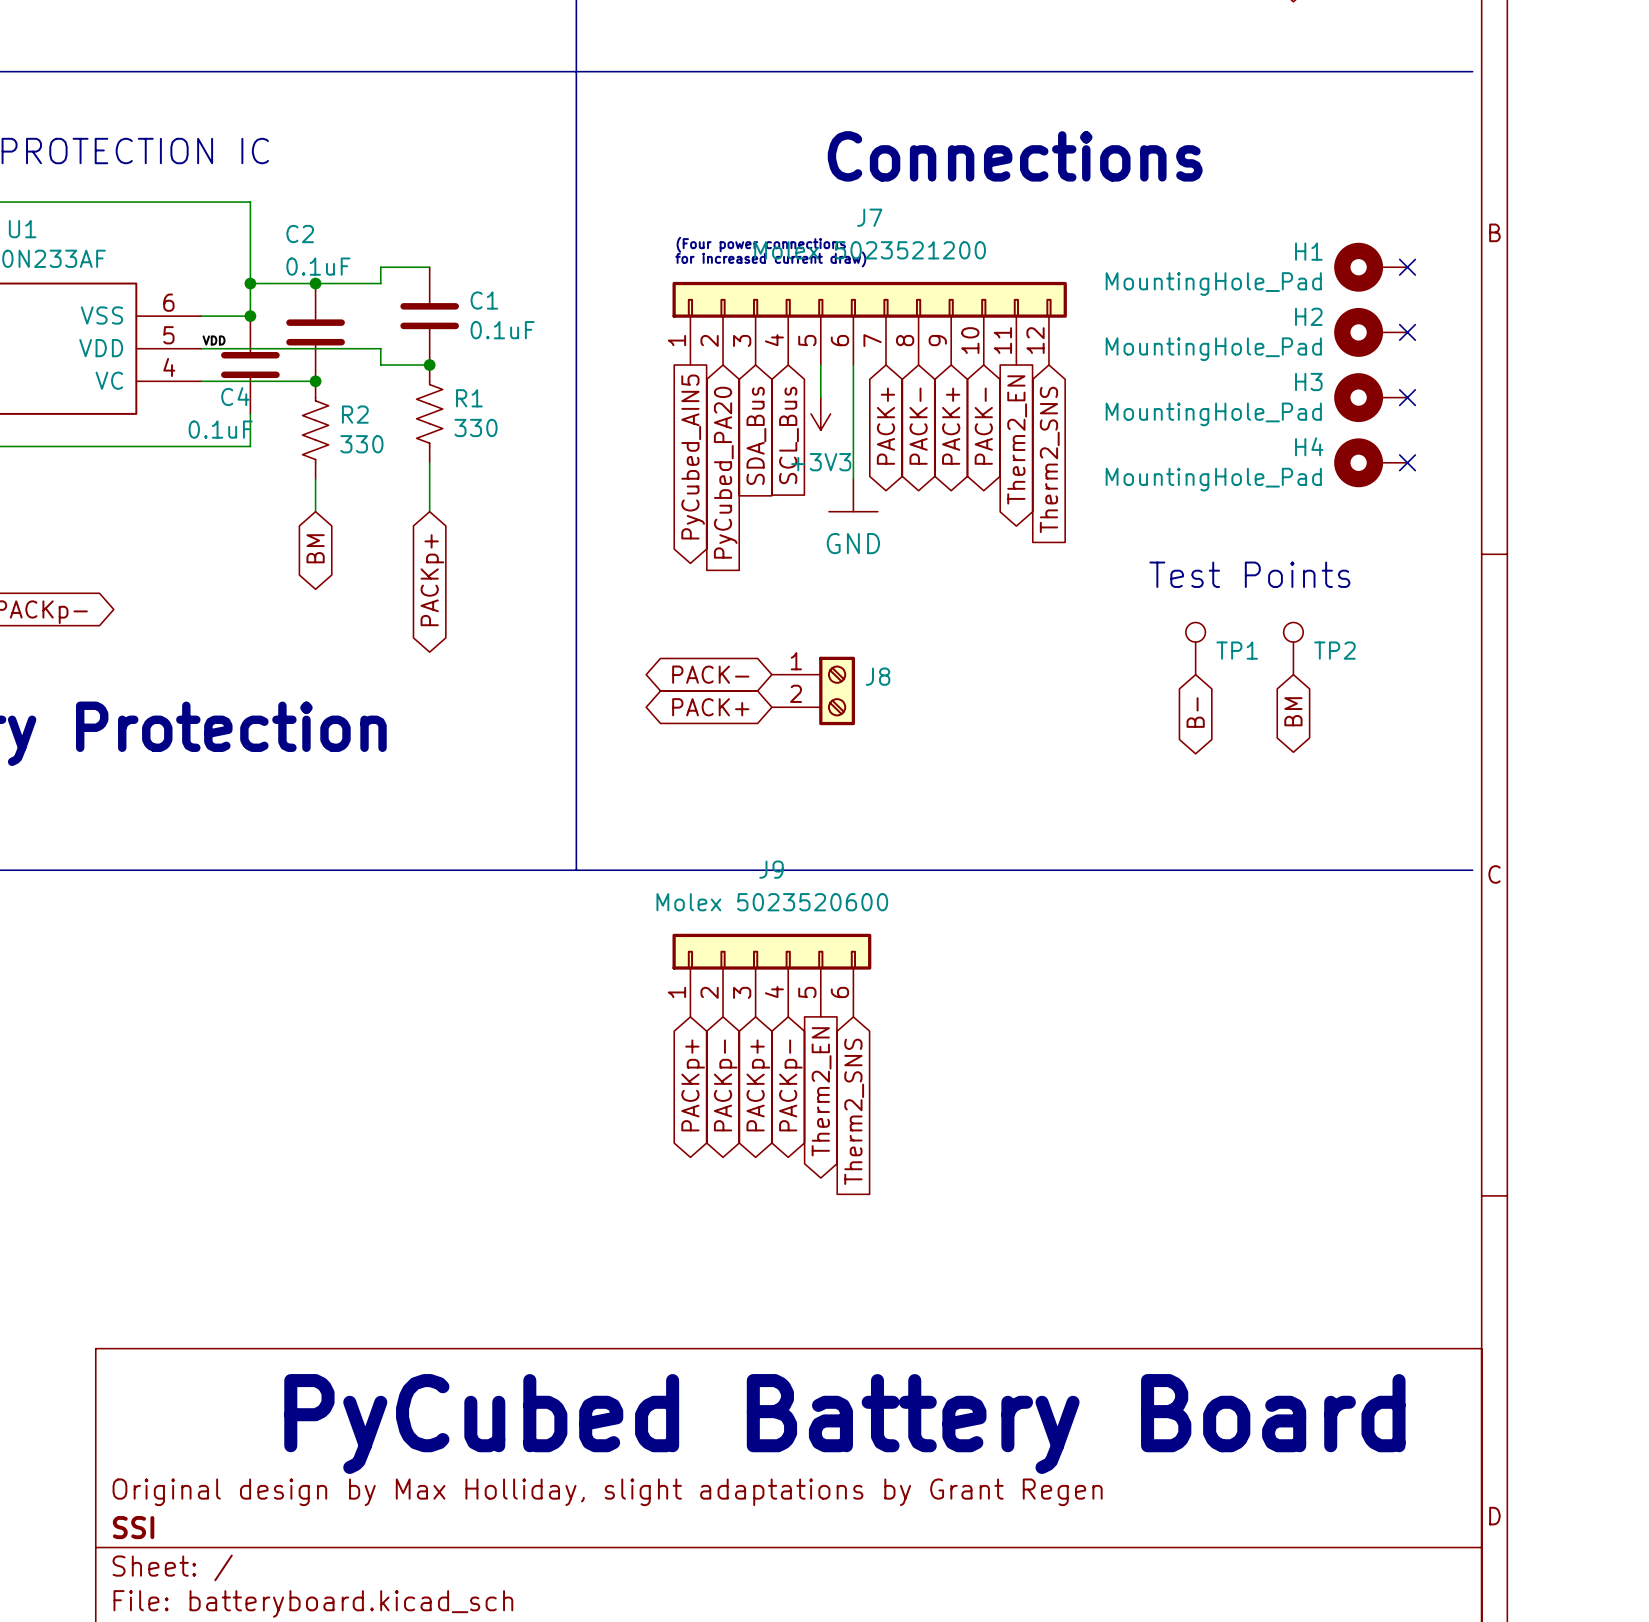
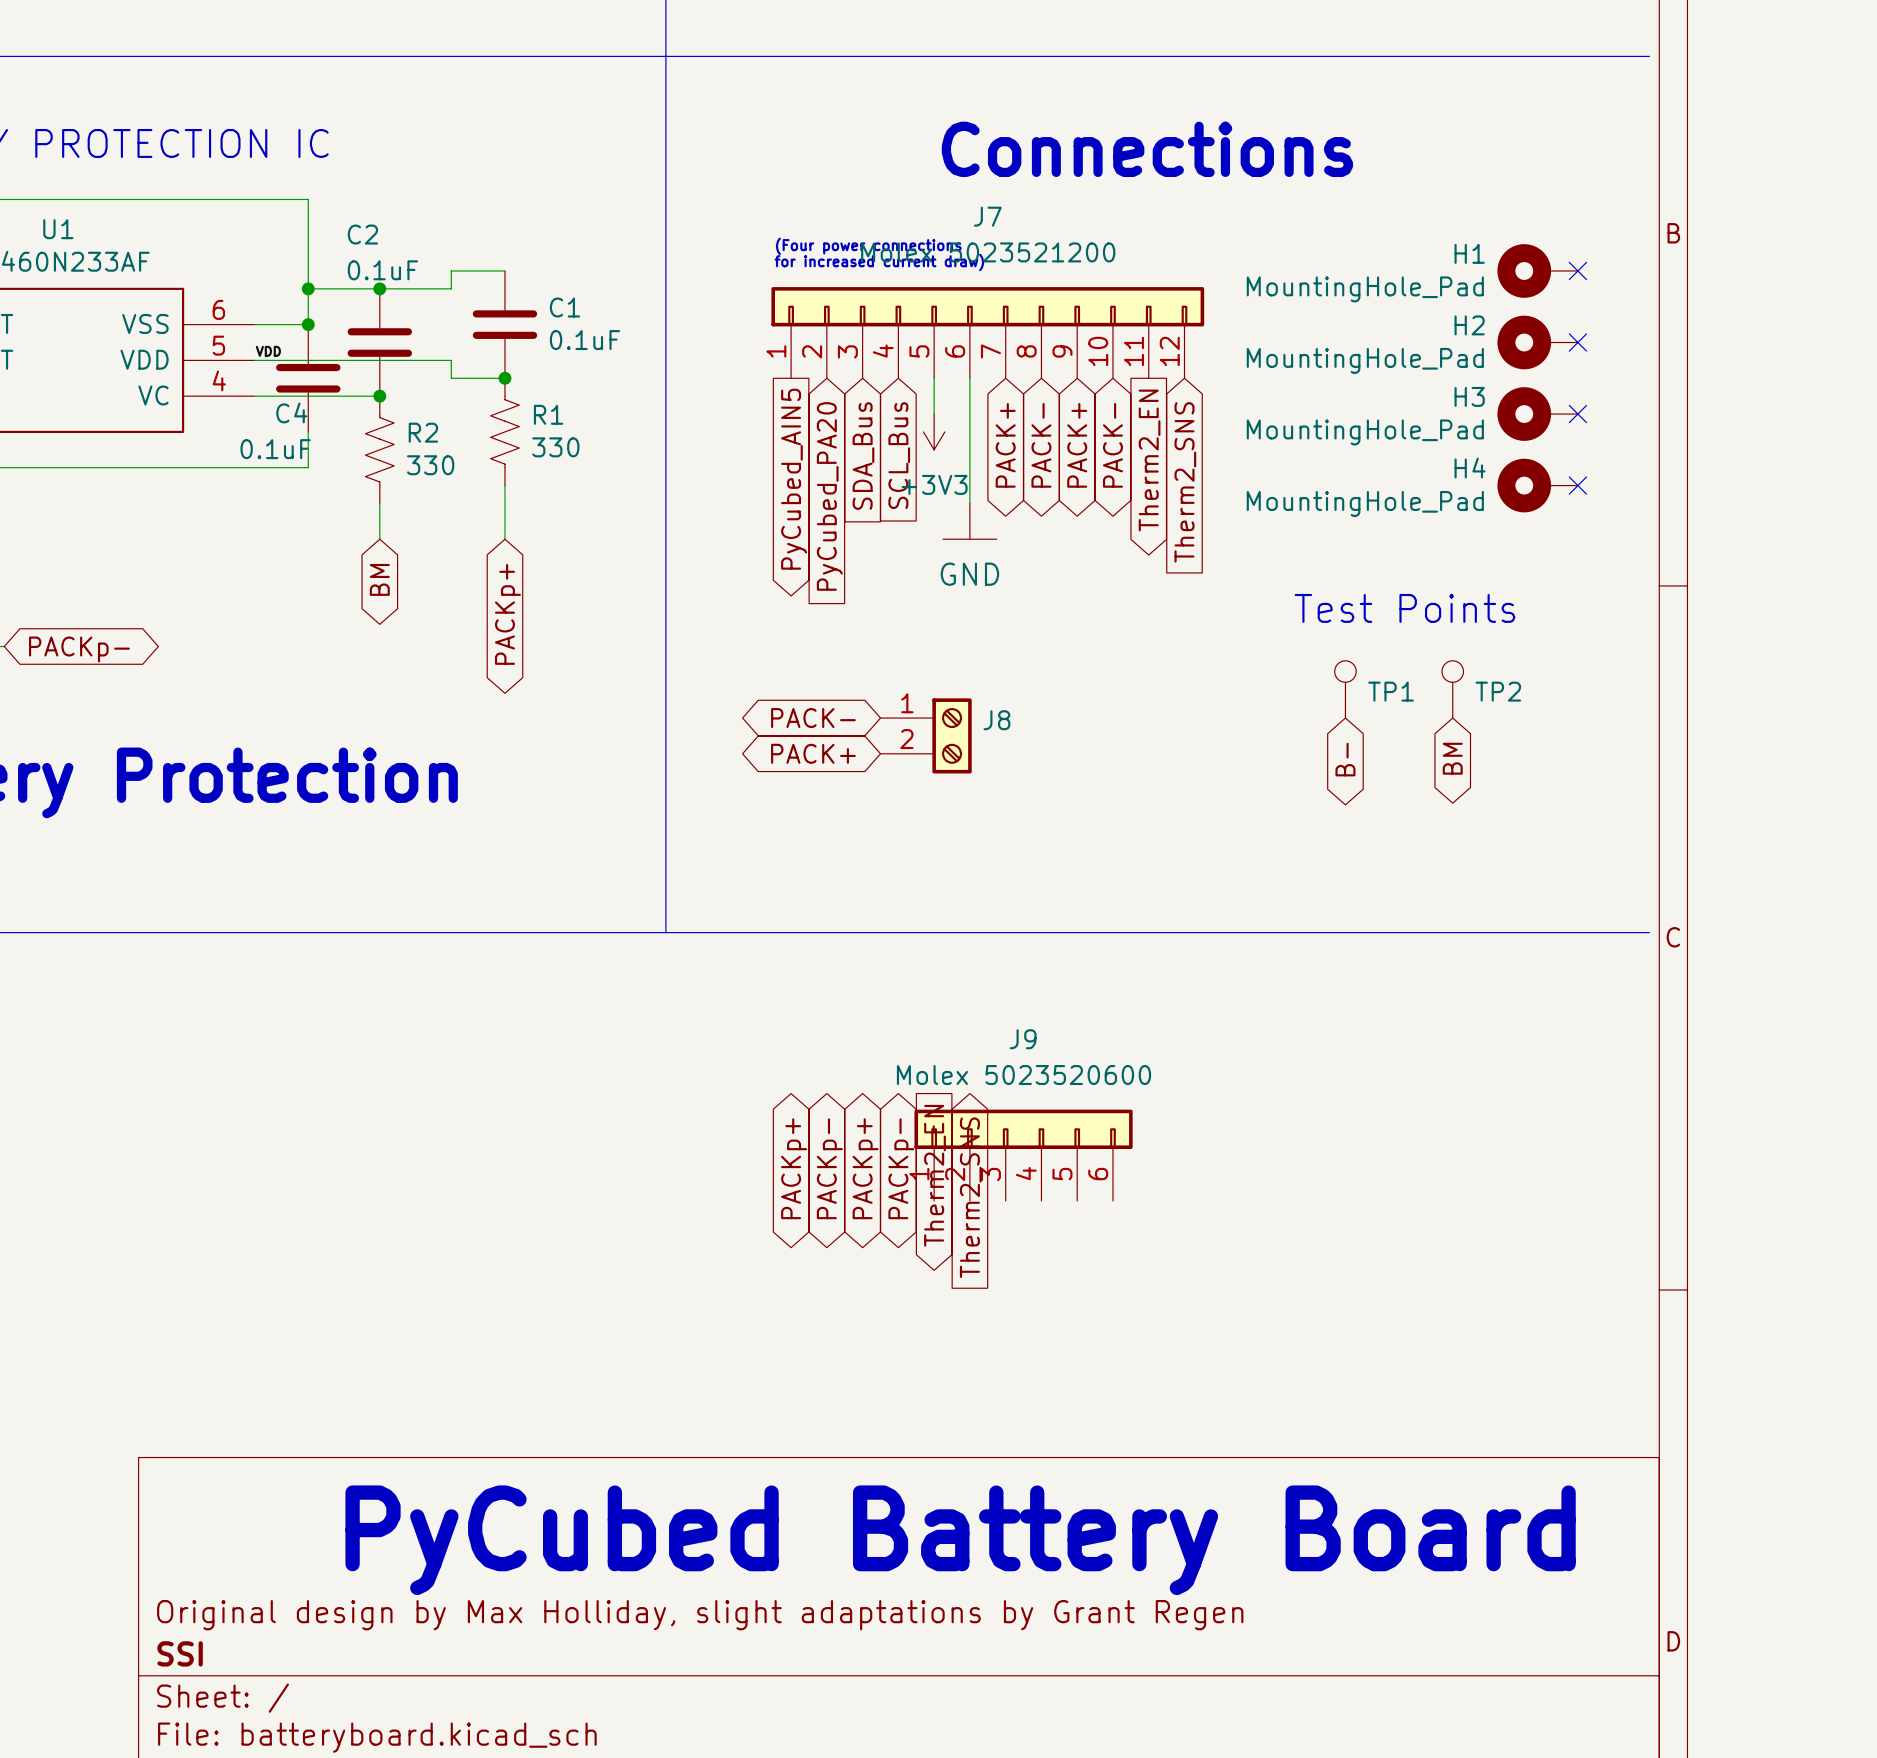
J9 position: (771, 975) -> (1023, 1155)

